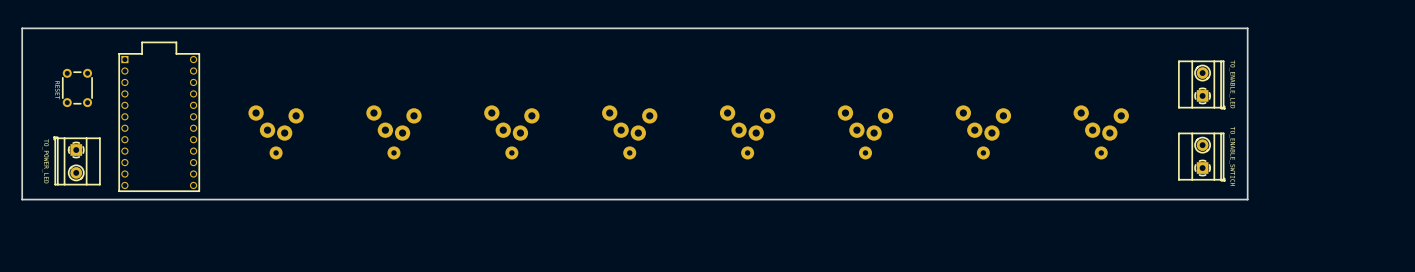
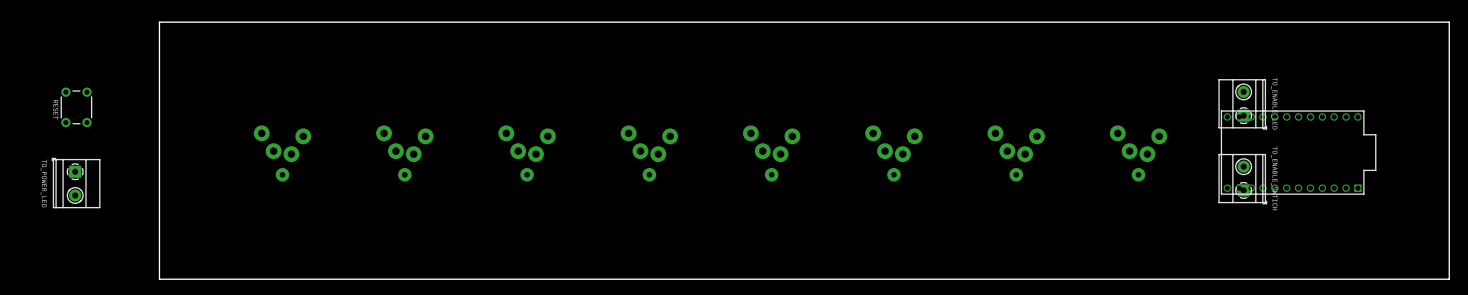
board edge: (1247, 28) (22, 28) (22, 199) (1247, 199) (1247, 28) -> (1449, 22) (1449, 279) (159, 279) (159, 22) (1449, 22)
part: (159, 116) -> none
part: none -> (1298, 152)

